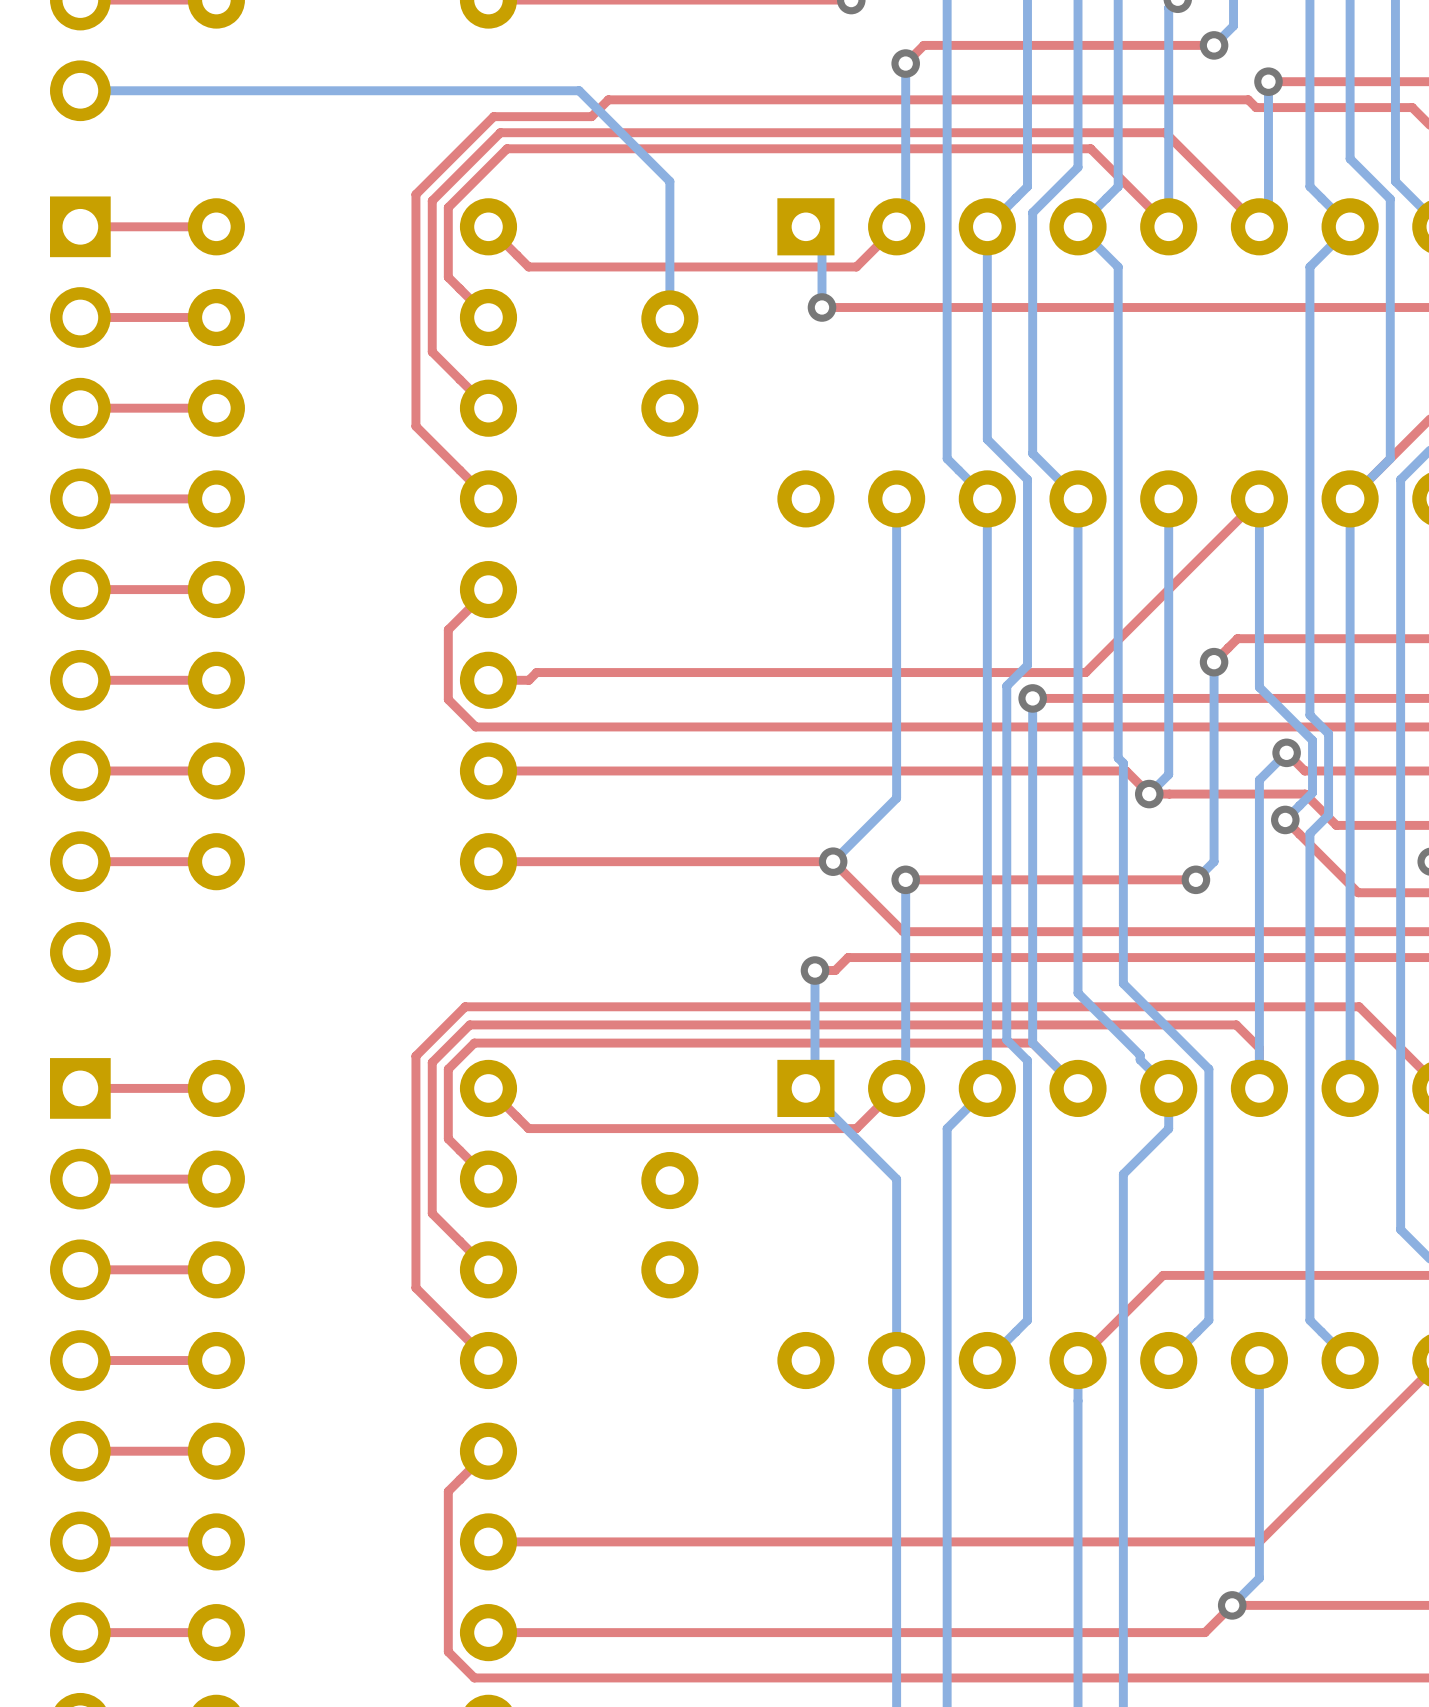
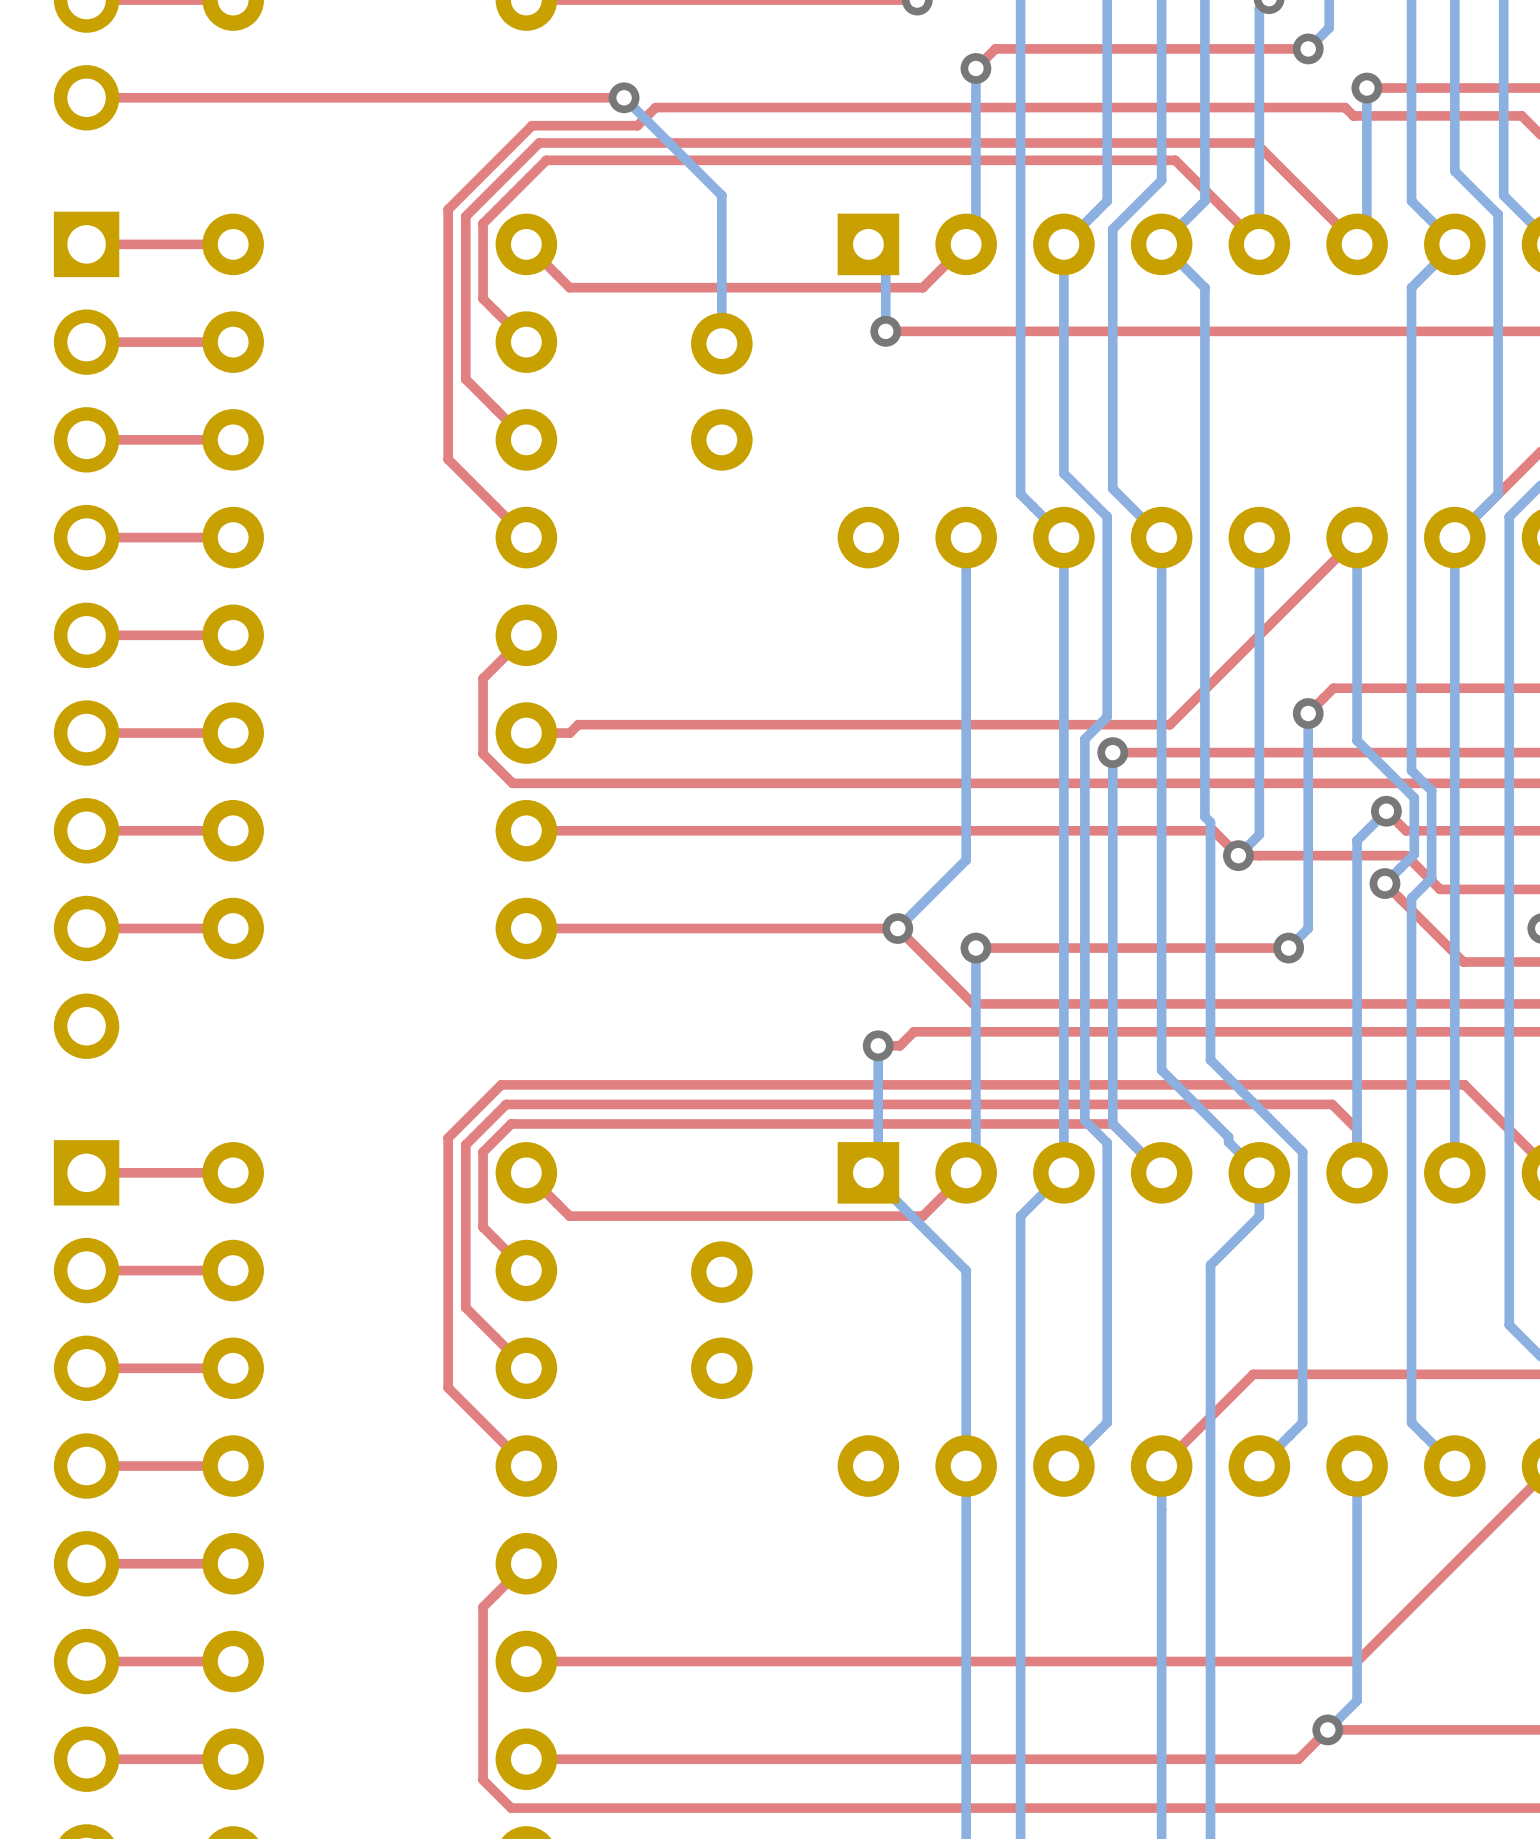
bottom track: (579, 90) (80, 90) -> none
top track: none -> (624, 97) (86, 97)
via: none -> (624, 97)

